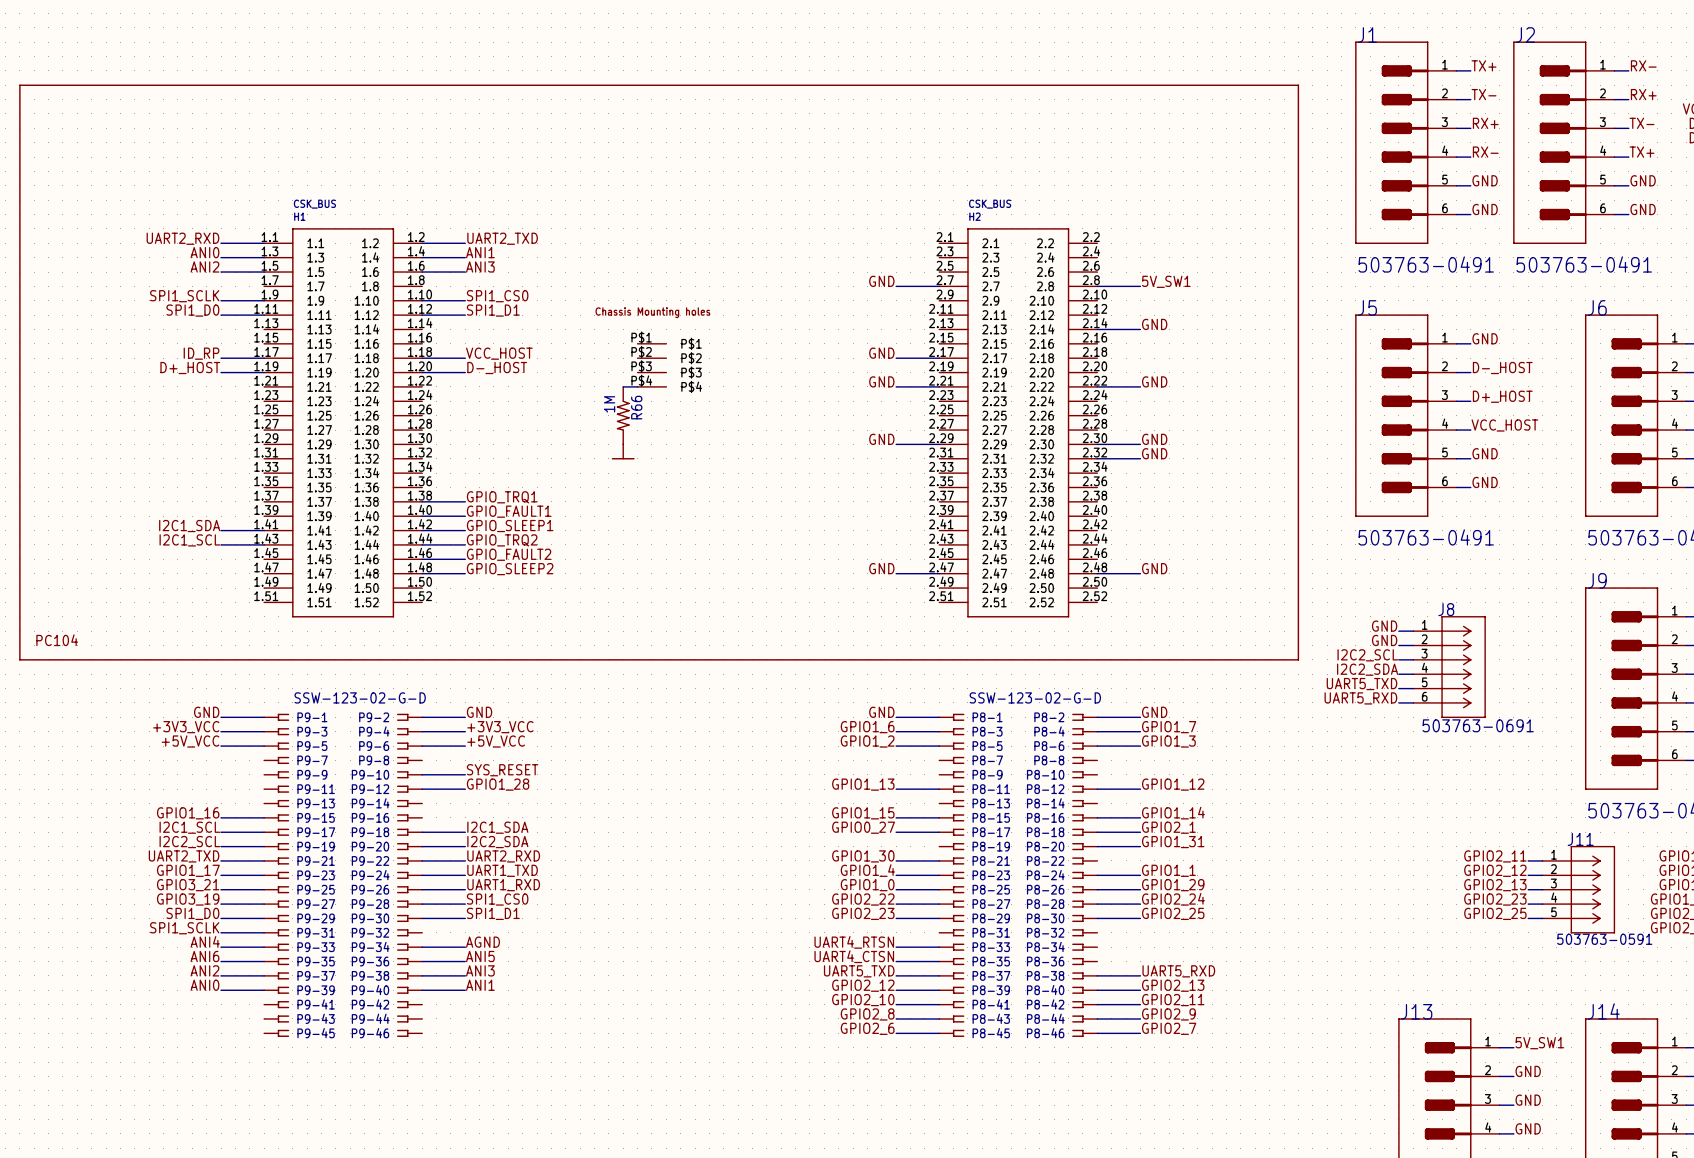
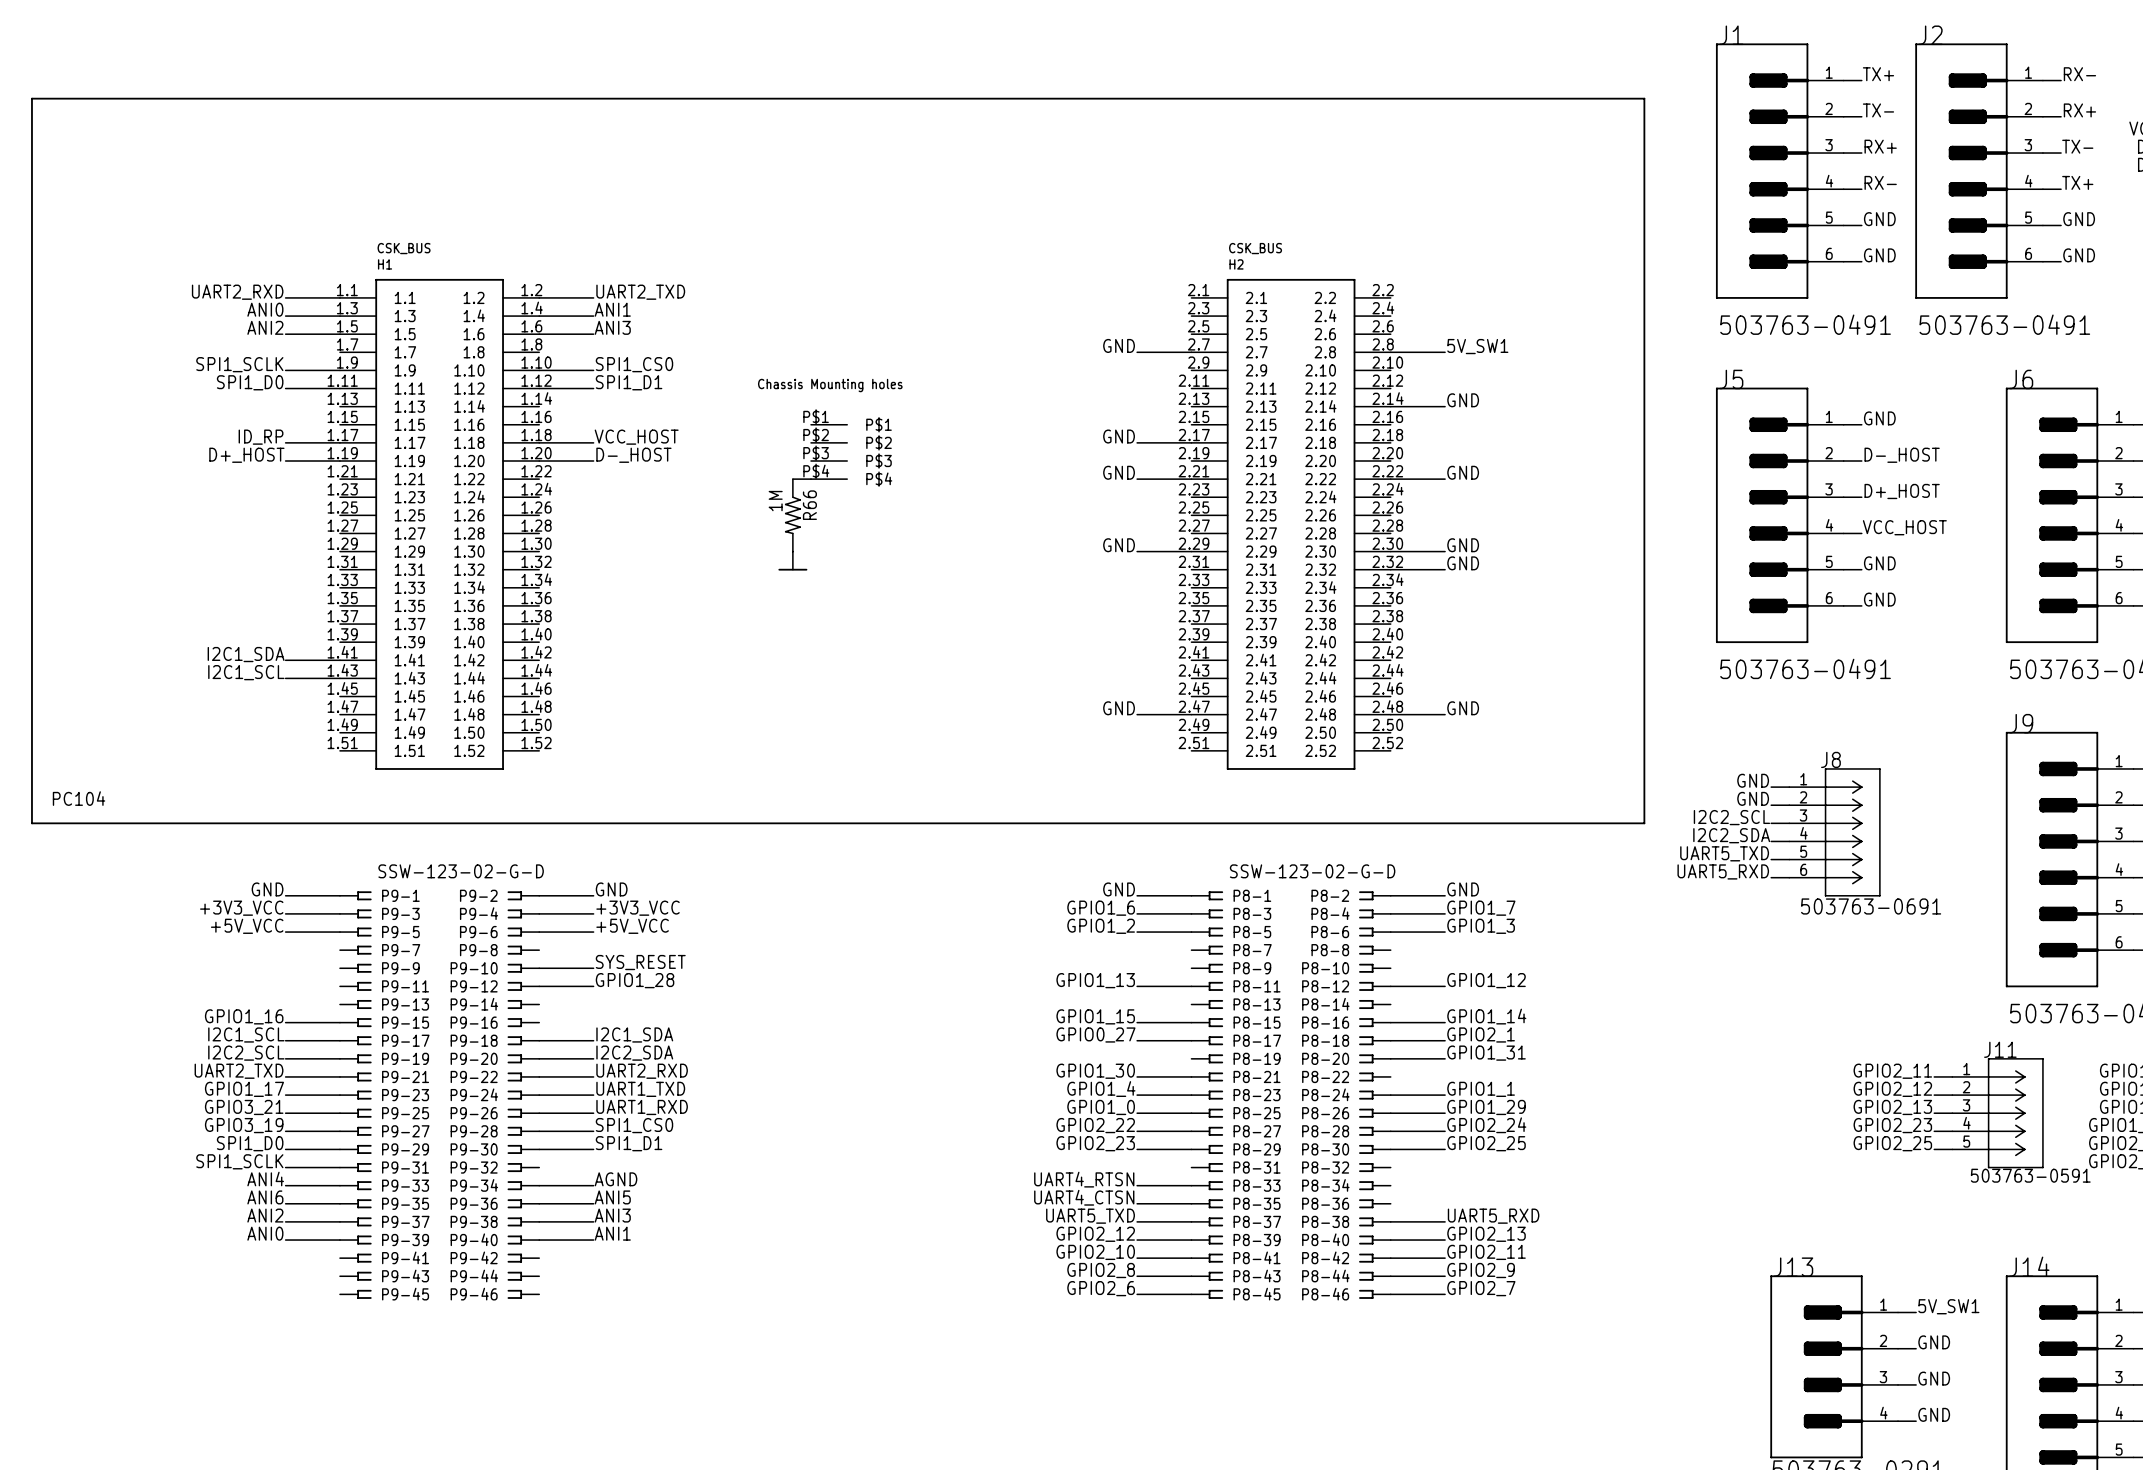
label: GPIO_TRQ1 (502, 497) -> none
wire: (422, 501) (465, 501) -> none
label: GPIO_FAULT1 (509, 511) -> none
wire: (422, 516) (465, 516) -> none
label: GPIO_SLEEP1 (510, 526) -> none
wire: (422, 530) (465, 530) -> none
label: GPIO_TRQ2 (502, 540) -> none
wire: (422, 544) (465, 544) -> none
label: GPIO_FAULT2 (509, 554) -> none
wire: (422, 559) (465, 559) -> none
label: GPIO_SLEEP2 (510, 569) -> none
wire: (422, 573) (465, 573) -> none

